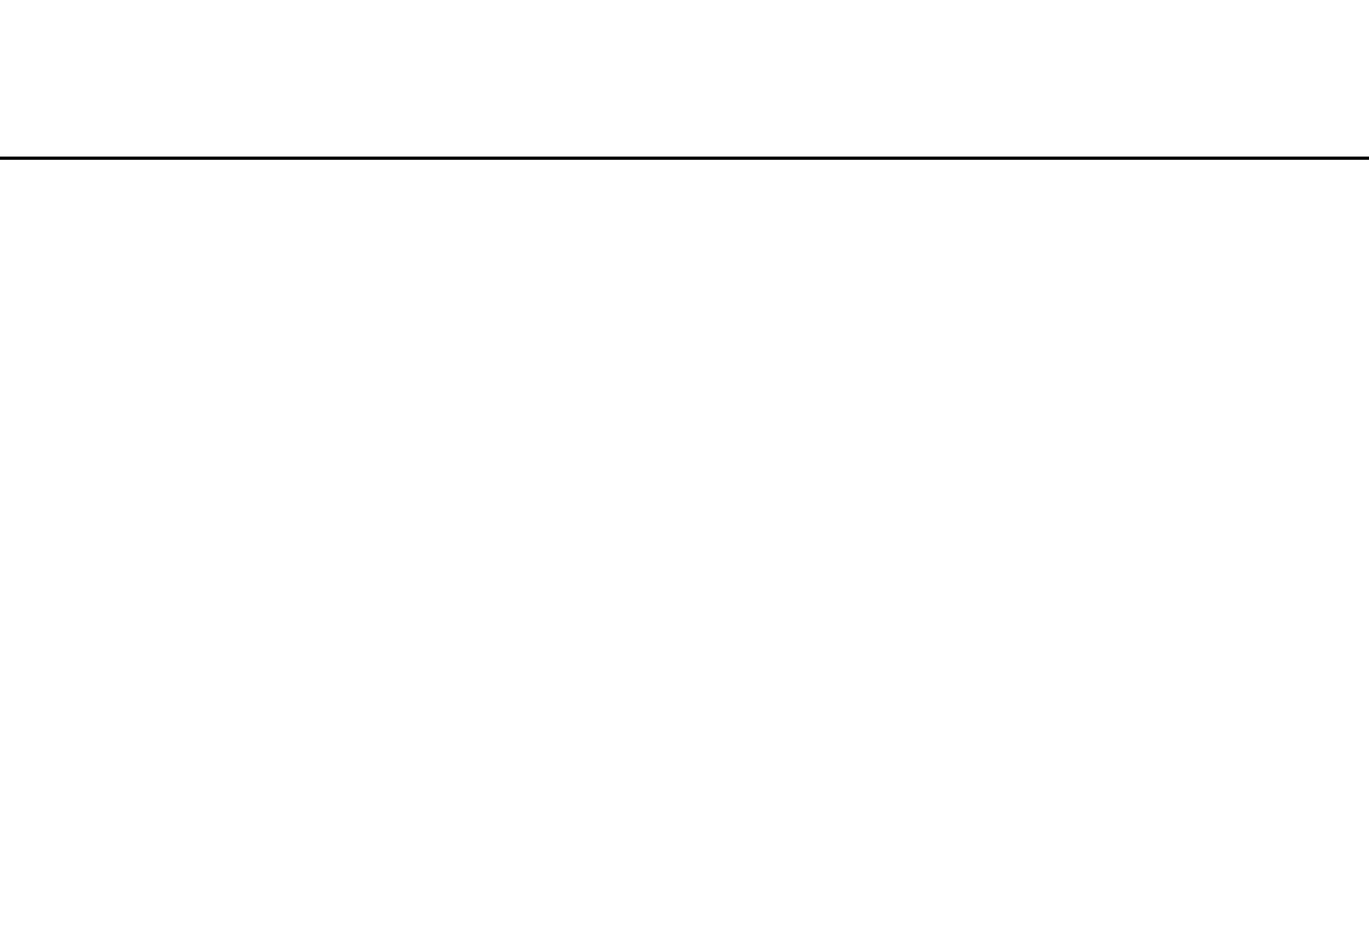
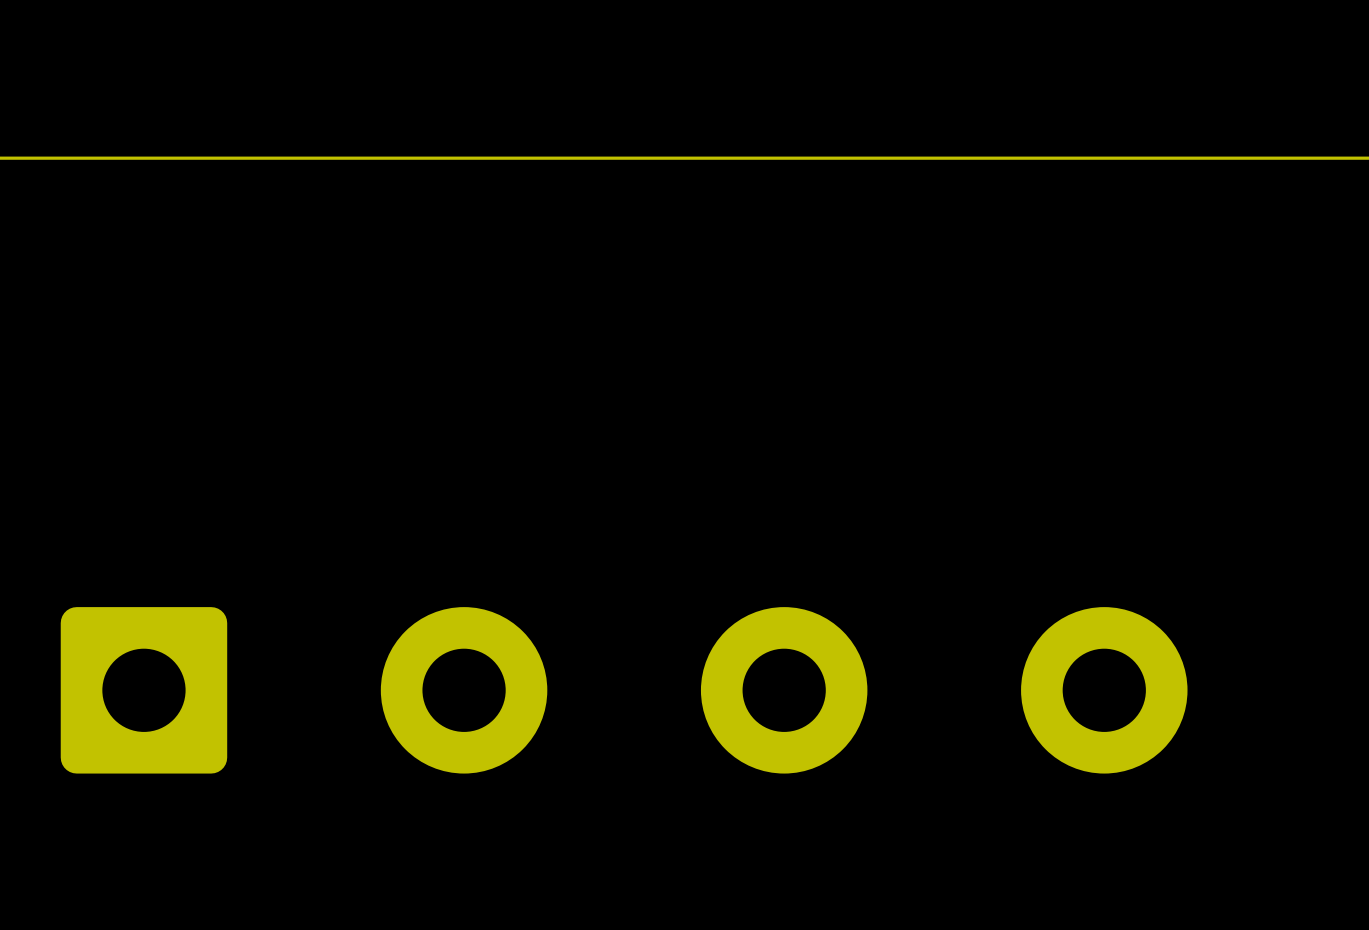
part: none -> (624, 690)

